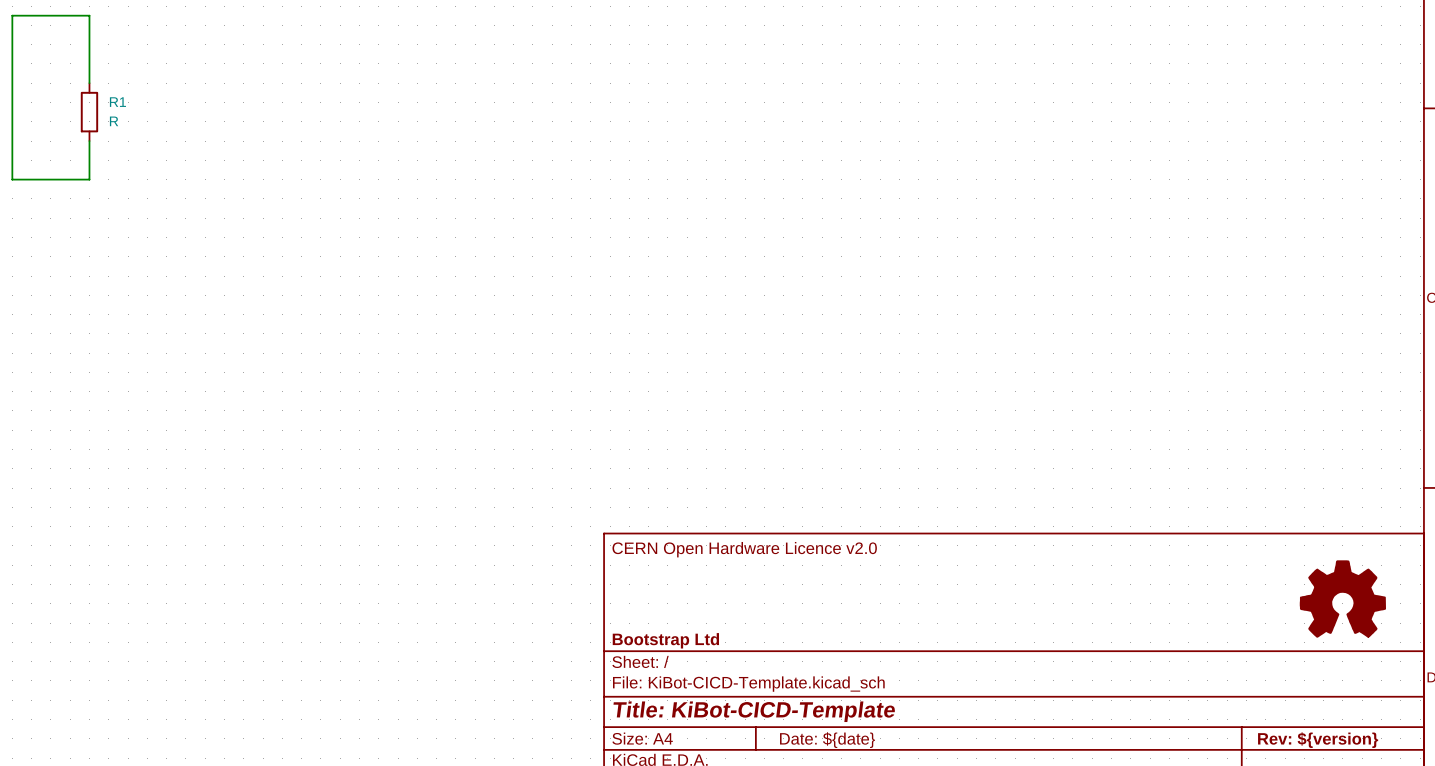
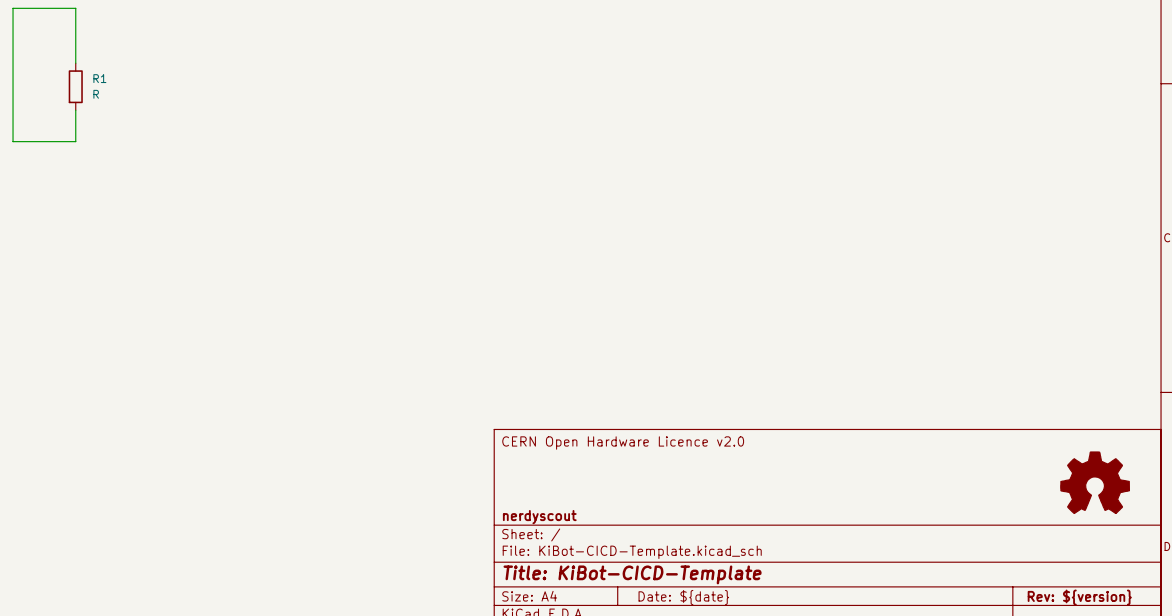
title block: Bootstrap Ltd (665, 640) -> nerdyscout (539, 517)

